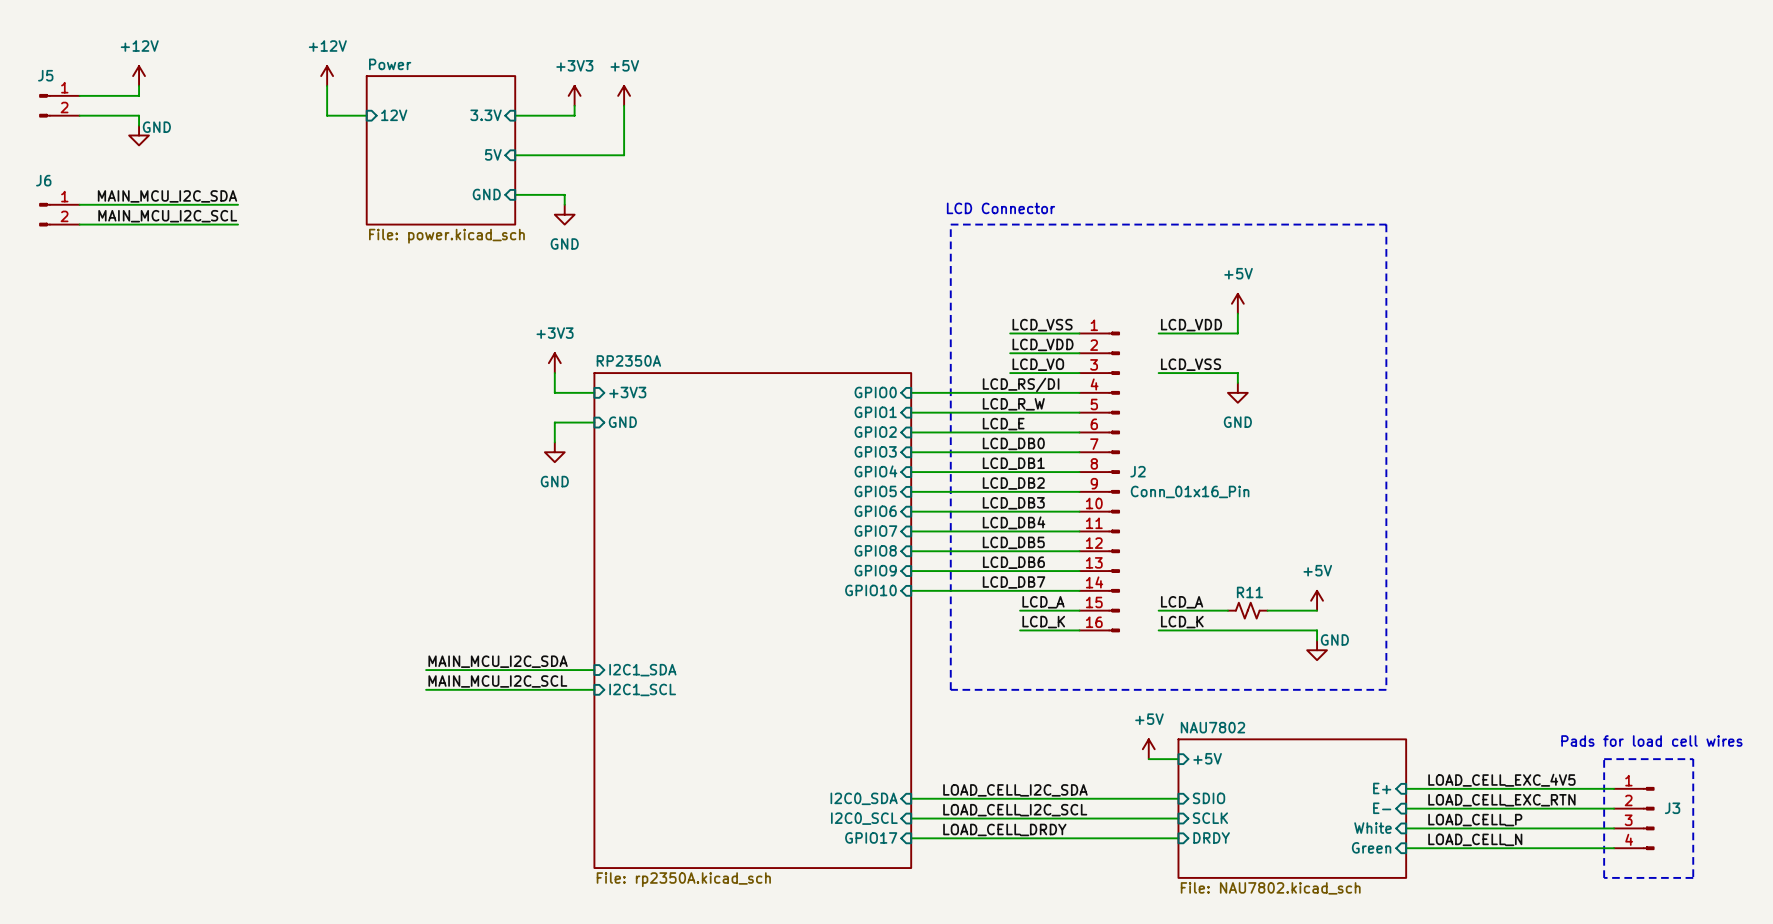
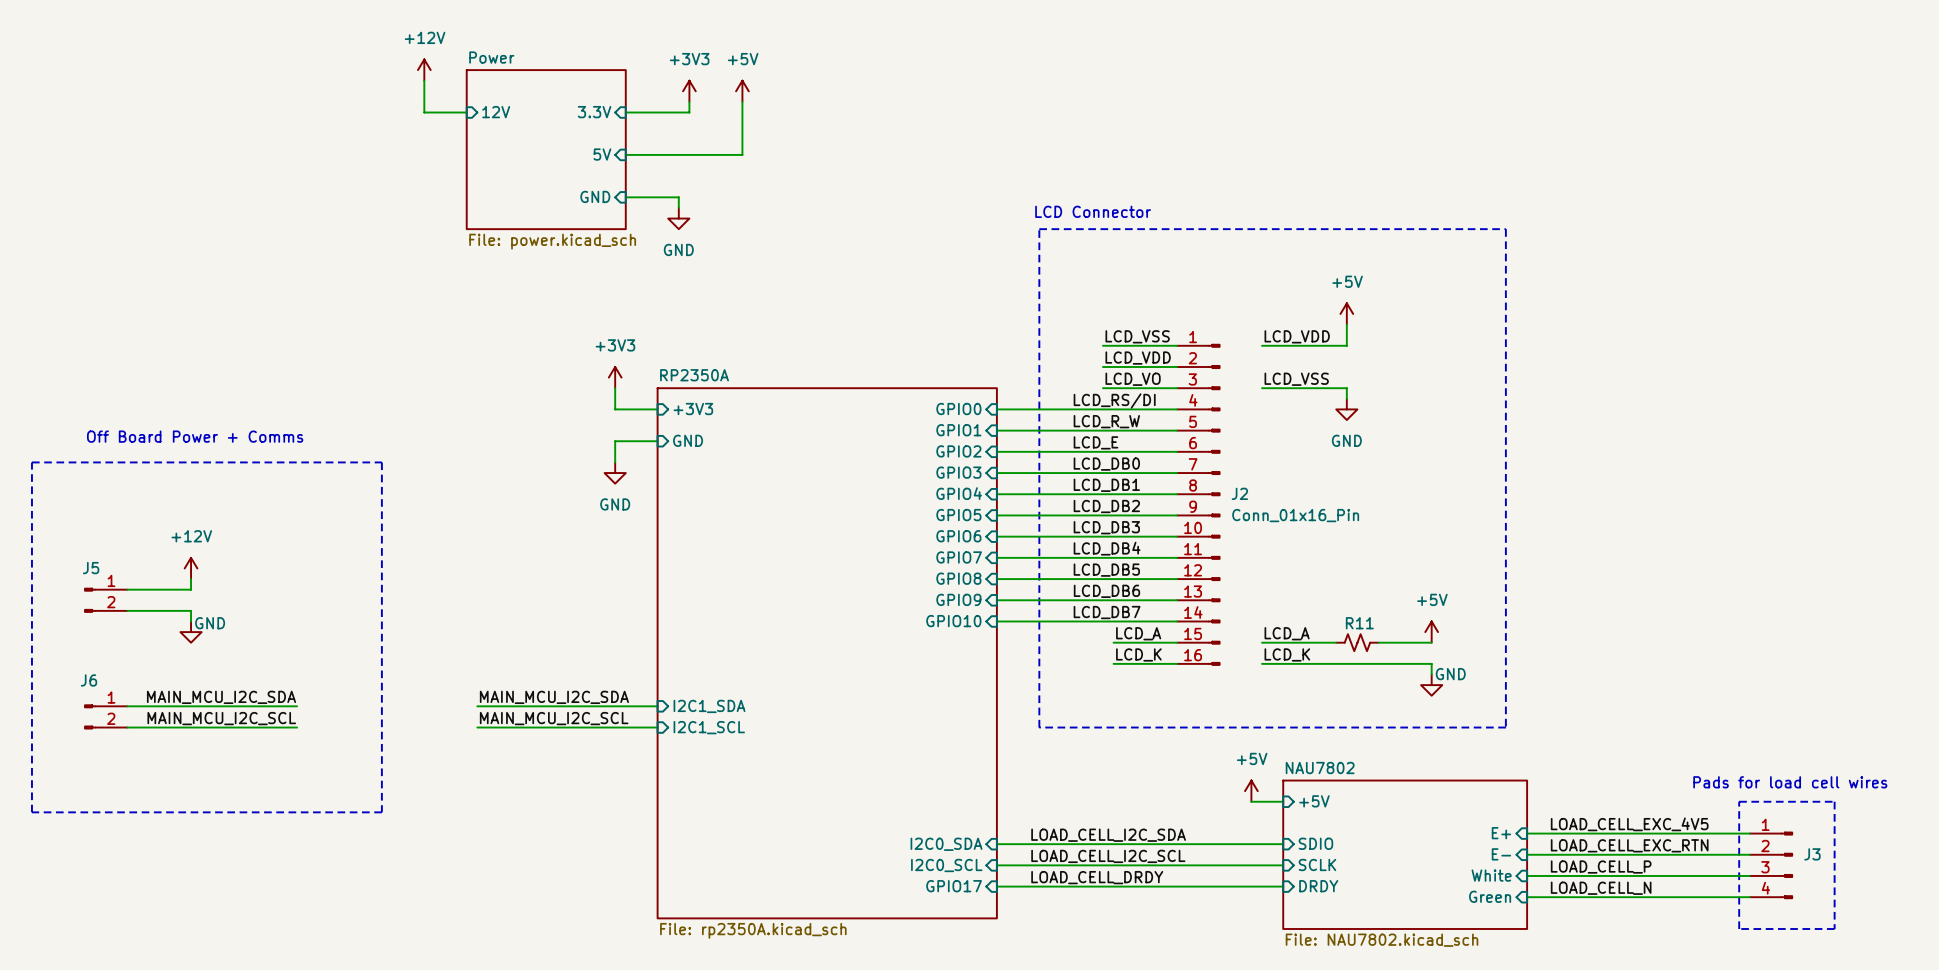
power symbol: +12V (139, 76) -> none
power symbol position: +12V (327, 76) -> +12V (424, 70)
wire: (139, 85) (139, 95) (79, 95) -> none
wire: (327, 85) (327, 115) (366, 115) -> (424, 80) (424, 112) (466, 112)
power symbol: +3V3 (574, 95) -> none
power symbol: +5V (624, 95) -> +3V3 (689, 91)
power symbol: none -> +5V (742, 91)
J5 position: (59, 105) -> (105, 600)
wire: (574, 105) (574, 115) -> (689, 112) (636, 112)
wire: (79, 115) (139, 115) (139, 125) -> none
sheet pin position: 12V (394, 115) -> 12V (496, 112)
sheet pin position: 3.3V (486, 115) -> 3.3V (594, 112)
wire: (515, 115) (564, 115) -> none
wire: (624, 115) (624, 155) -> (742, 101) (742, 154) (689, 154)
power symbol: GND (139, 135) -> none
sheet Power position: (440, 150) -> (546, 149)
sheet pin position: 5V (493, 154) -> 5V (602, 154)
wire: (515, 155) (564, 155) -> none
sheet pin position: GND (486, 194) -> GND (595, 196)
wire: (515, 194) (564, 194) (564, 204) -> (625, 197) (678, 197) (678, 207)
label: MAIN_MCU_I2C_SDA (167, 196) -> none
wire: (79, 204) (238, 204) -> none
J6 position: (59, 214) -> (105, 716)
power symbol position: GND (564, 214) -> GND (678, 218)
label: MAIN_MCU_I2C_SCL (167, 216) -> none
wire: (79, 224) (238, 224) -> none
text: none -> Off Board Power + Comms (195, 436)
line: none -> (31, 462) (381, 462) (381, 812) (31, 812) (31, 462)
power symbol: none -> +12V (191, 568)
wire: none -> (191, 579) (191, 589) (127, 589)
wire: none -> (127, 610) (191, 610) (191, 621)
power symbol: none -> GND (191, 632)
label: none -> MAIN_MCU_I2C_SDA (221, 697)
wire: none -> (127, 706) (297, 706)
label: none -> MAIN_MCU_I2C_SCL (221, 718)
wire: none -> (127, 727) (297, 727)

